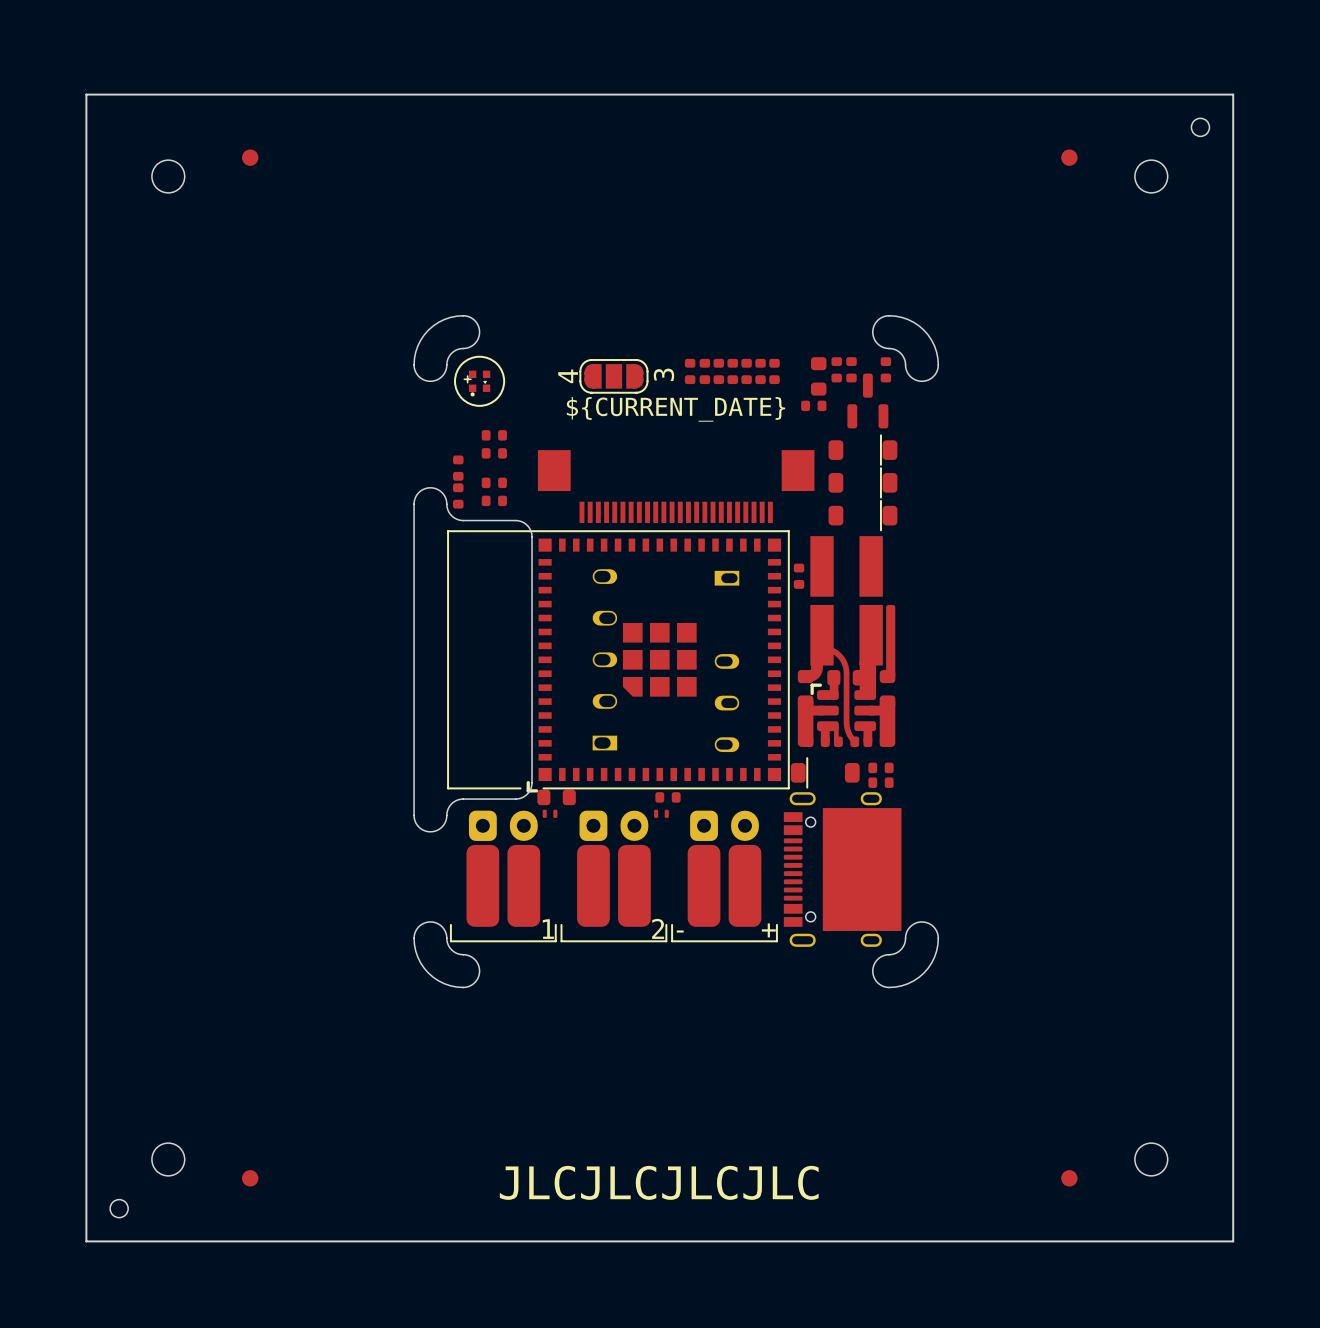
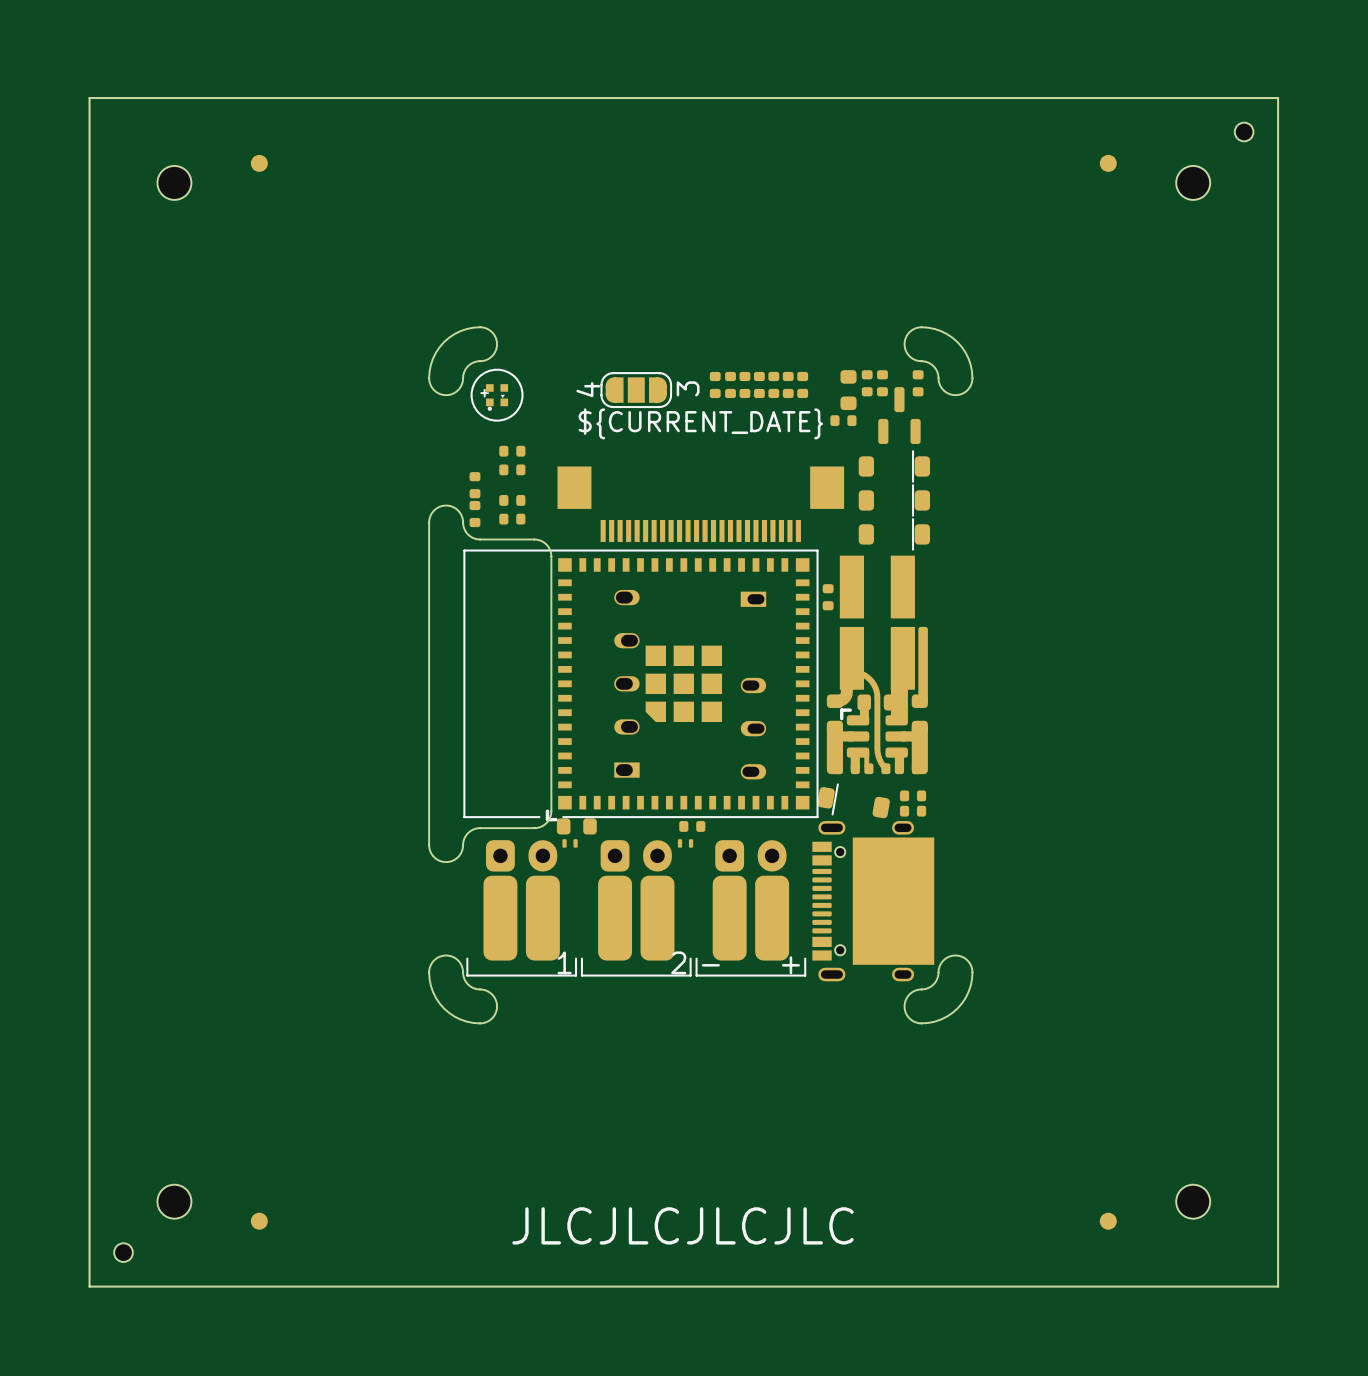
part rotation: 0° (825, 772) -> 10° clockwise (853, 800)

